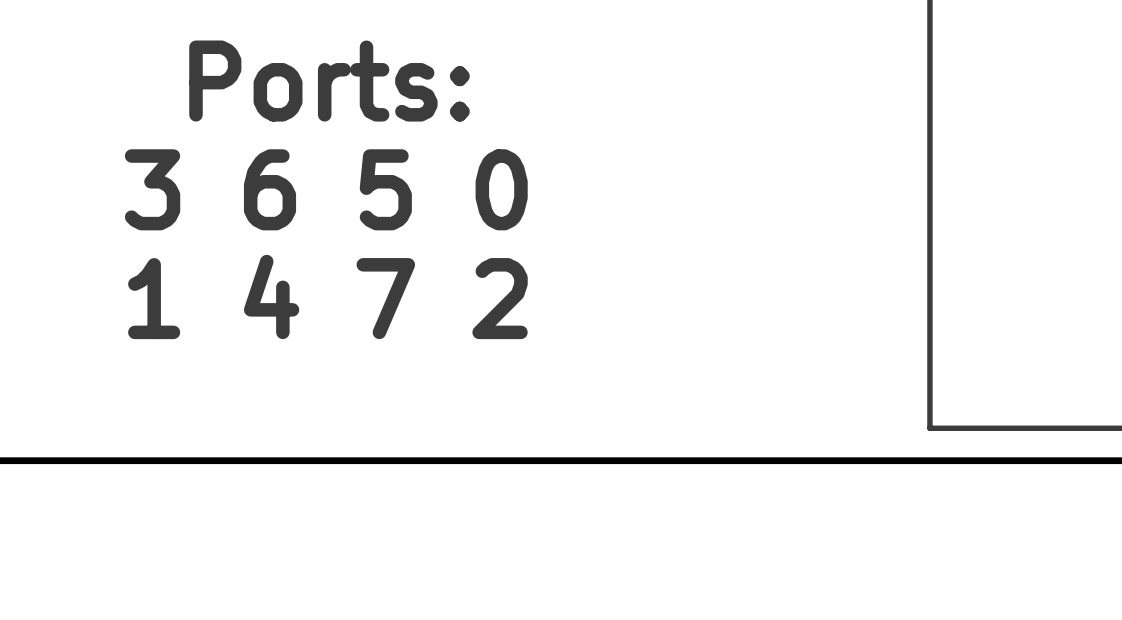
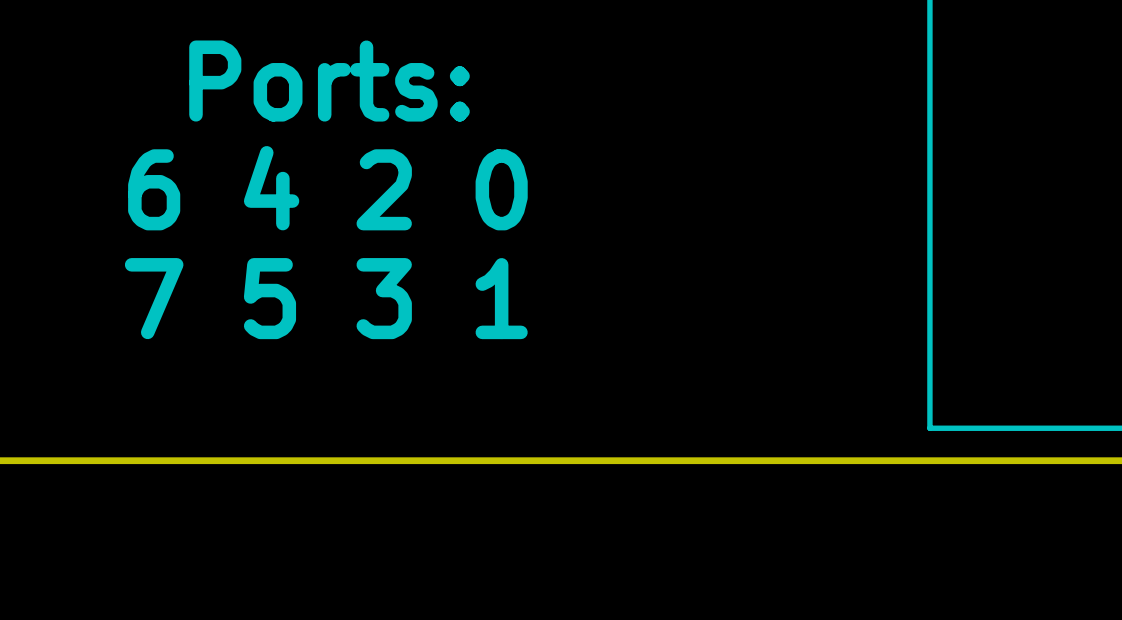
text: 3 6 5 0 (326, 189) -> 6 4 2 0 (327, 188)
text: 1 4 7 2 (327, 296) -> 7 5 3 1 (326, 298)

